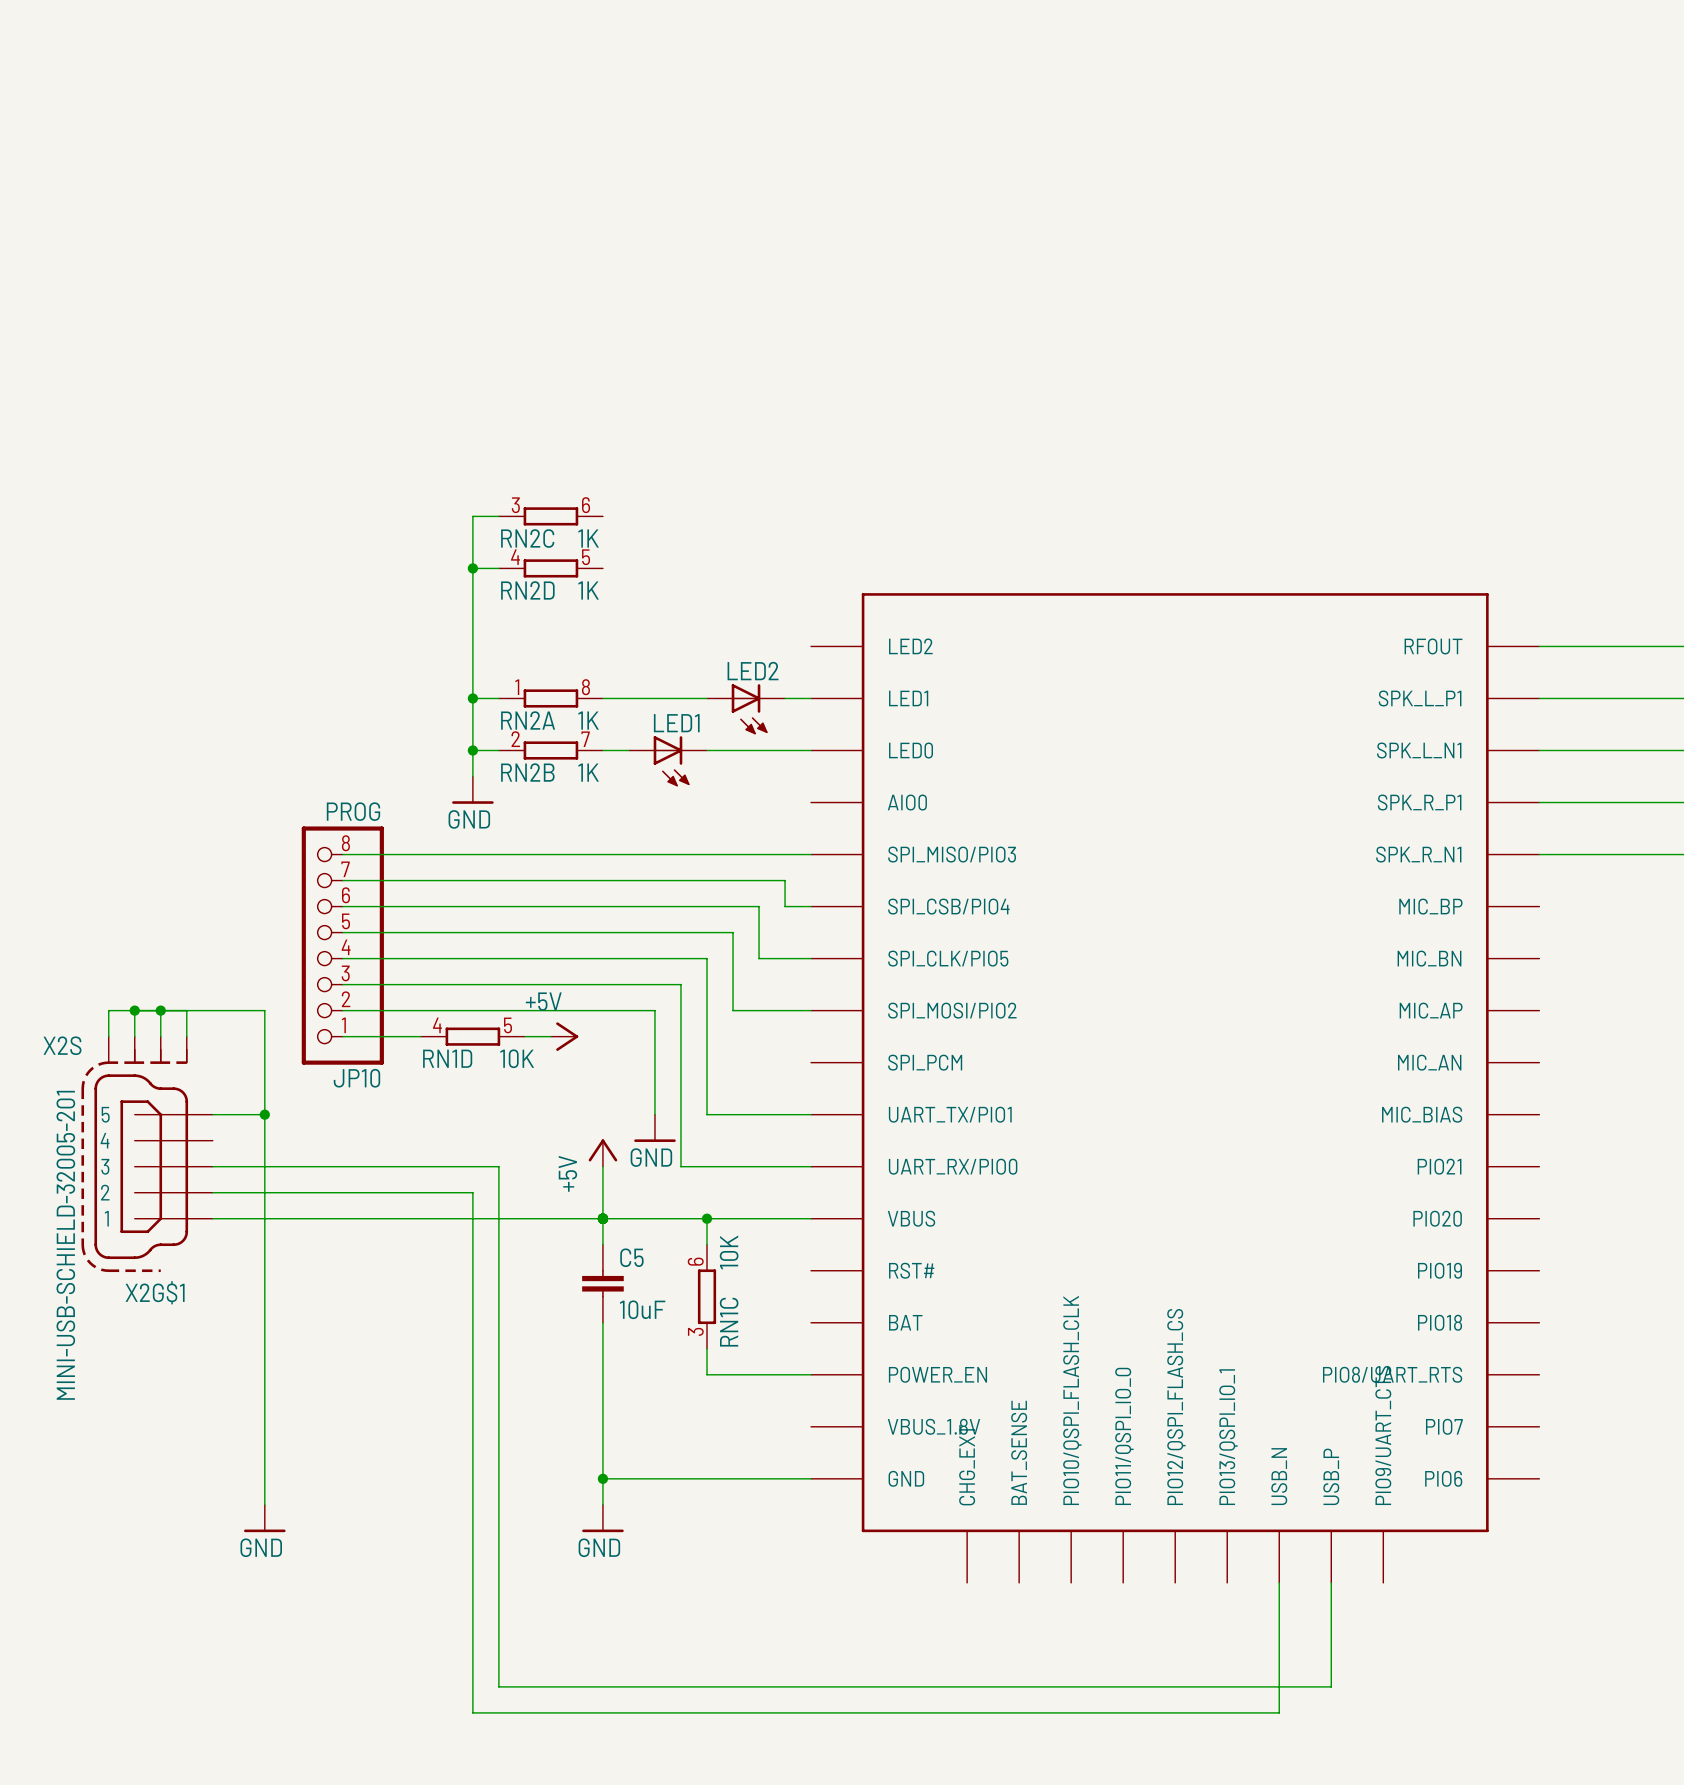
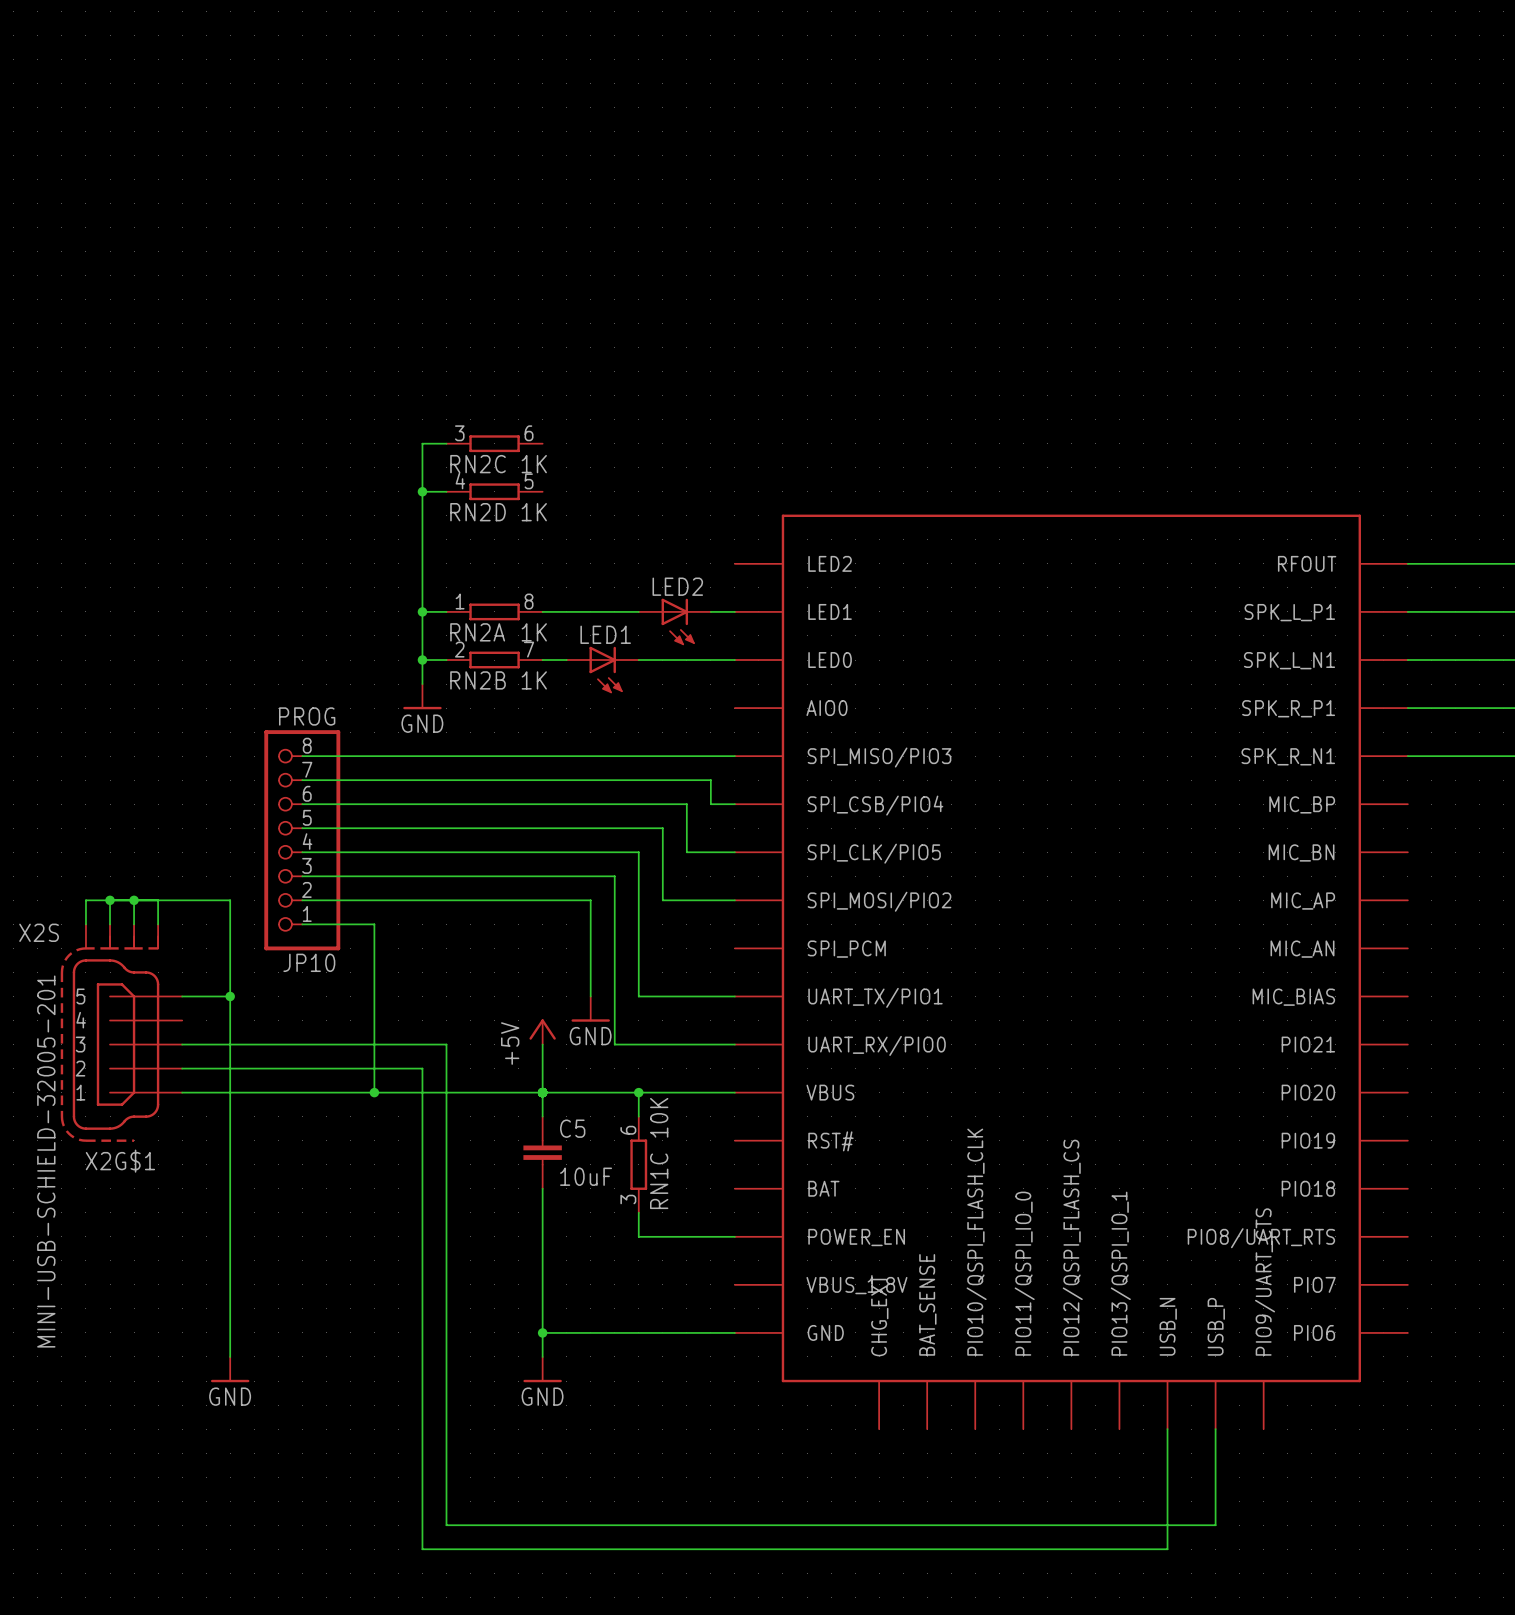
wire: none -> (374, 924) (374, 1092)
RN1D: 10K (472, 1036) -> none
wire: (524, 1036) (550, 1036) -> none
power symbol: +5V (564, 1036) -> none
junction: none -> (374, 1092)

